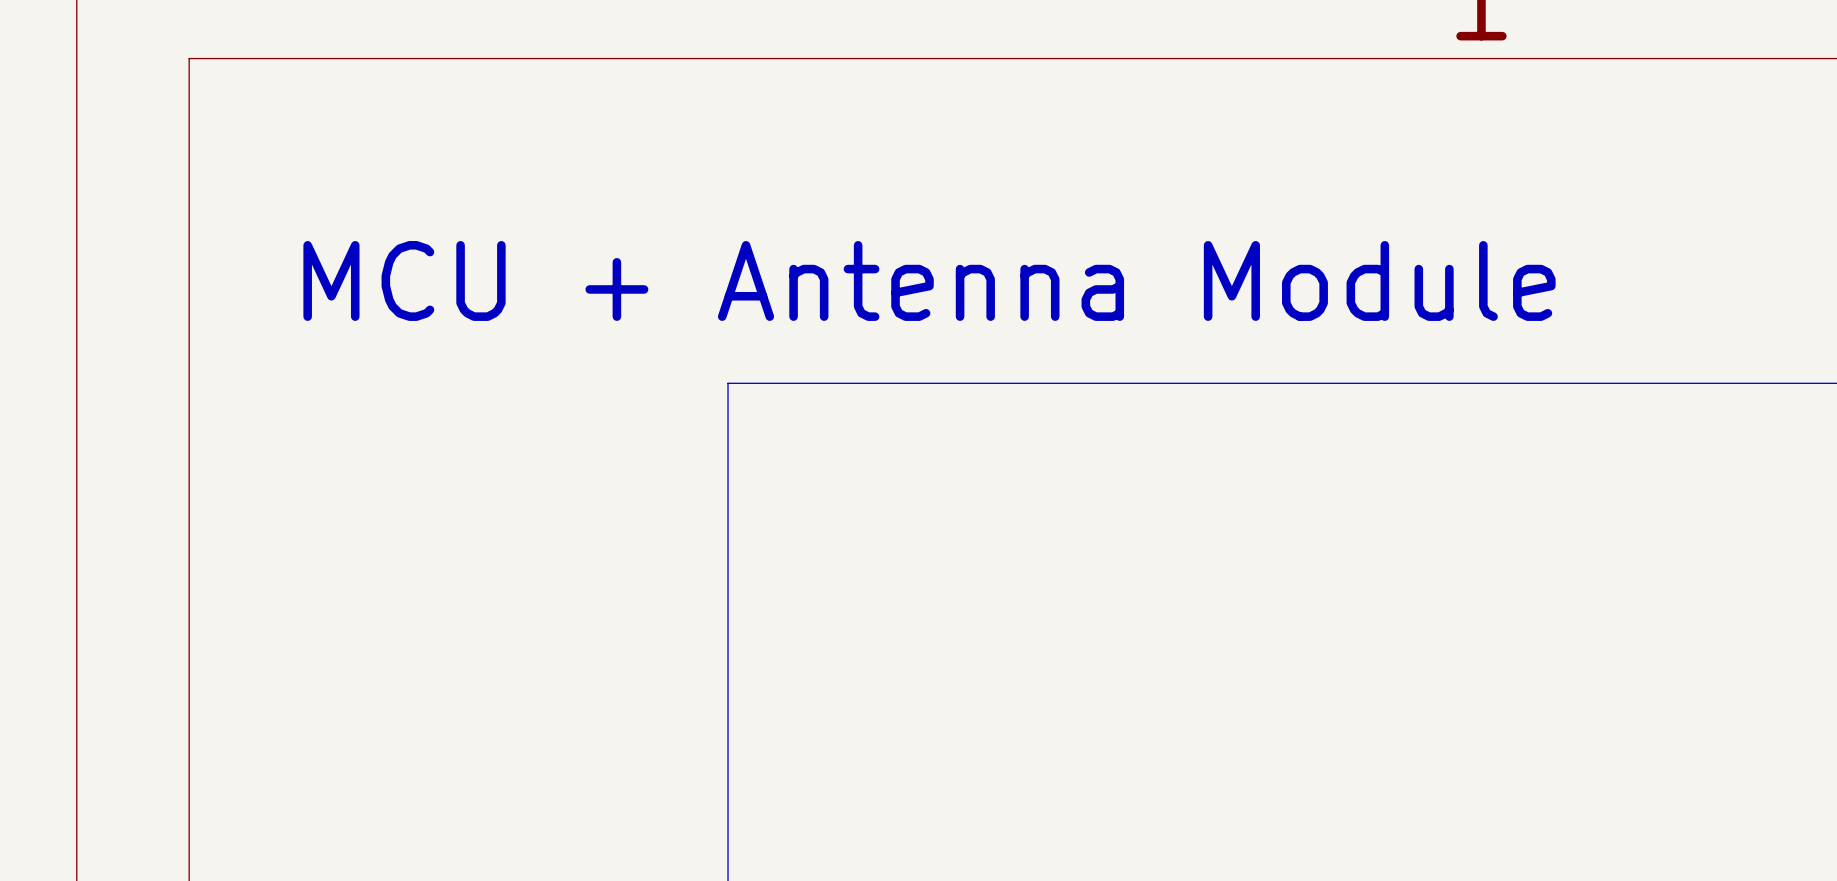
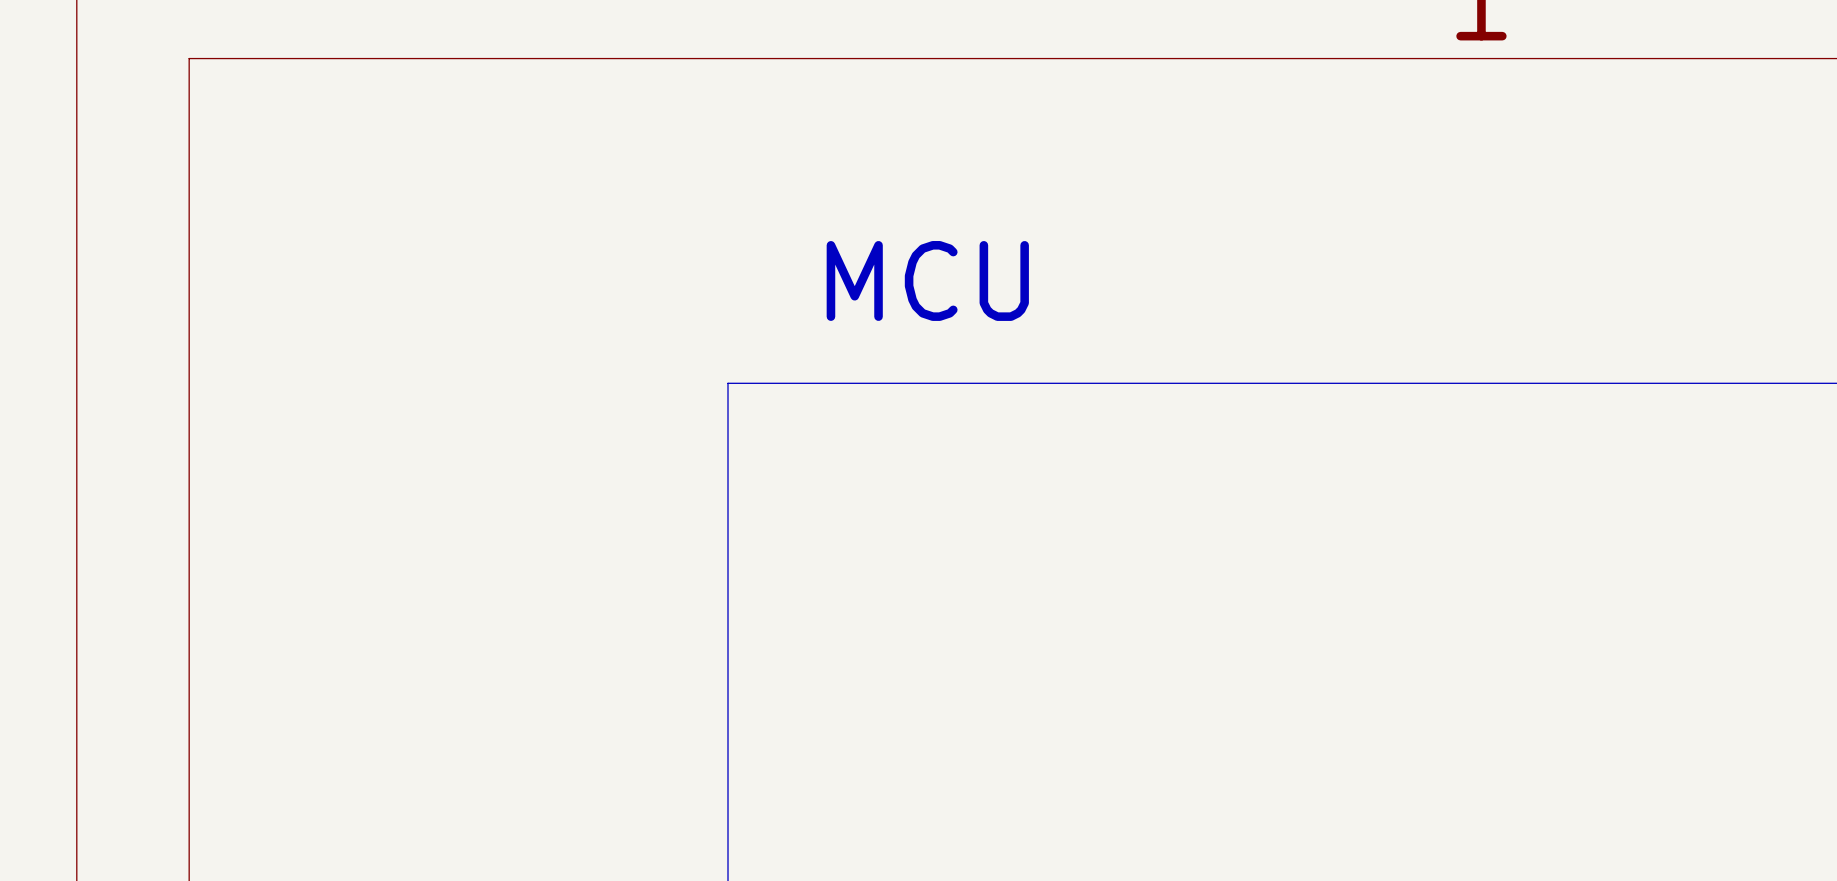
text: MCU + Antenna Module (929, 280) -> MCU (927, 280)

